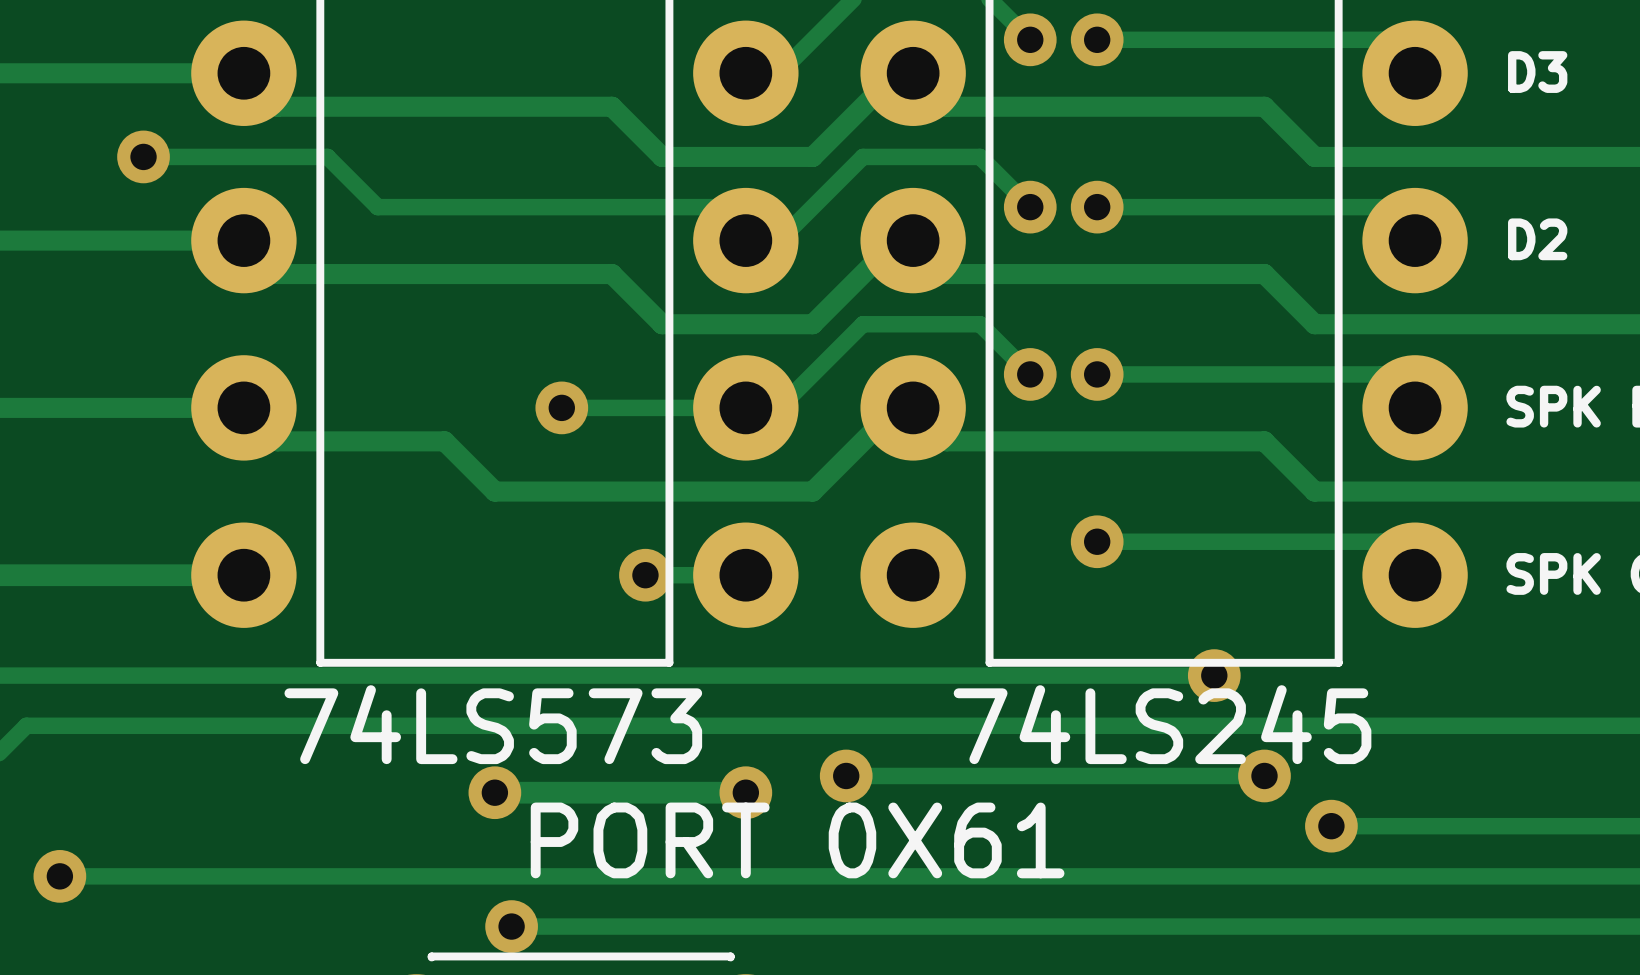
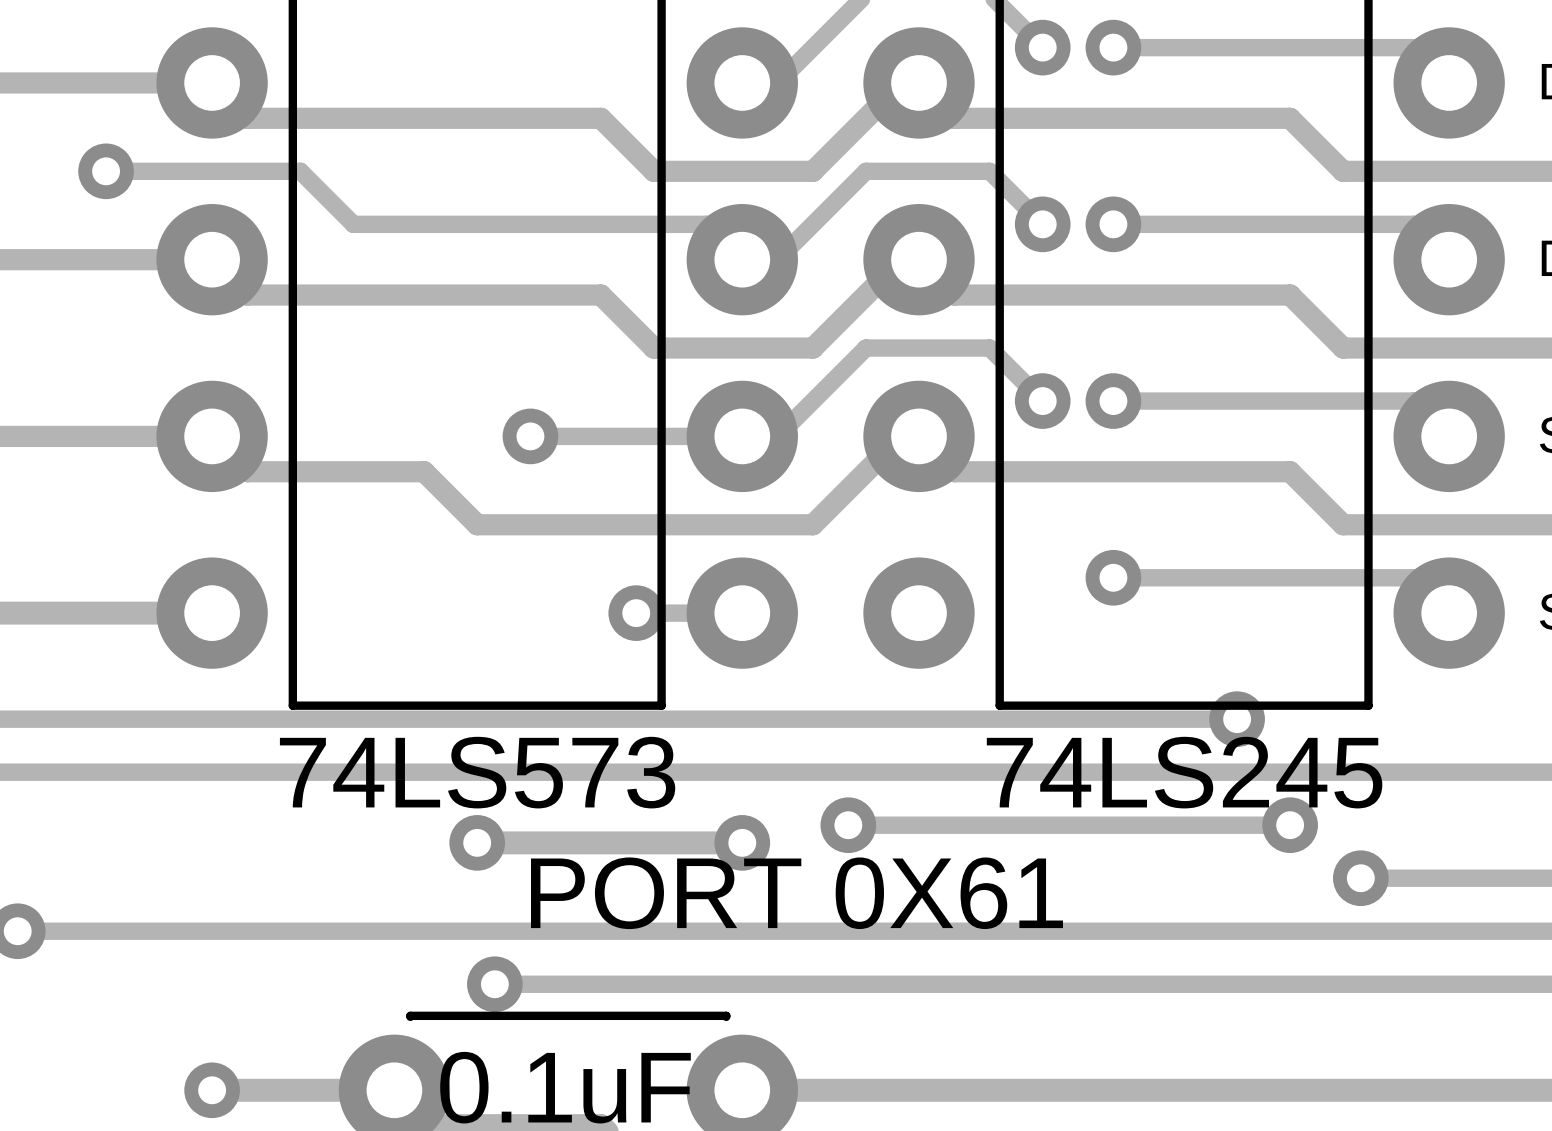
via position: (561, 407) -> (530, 436)

